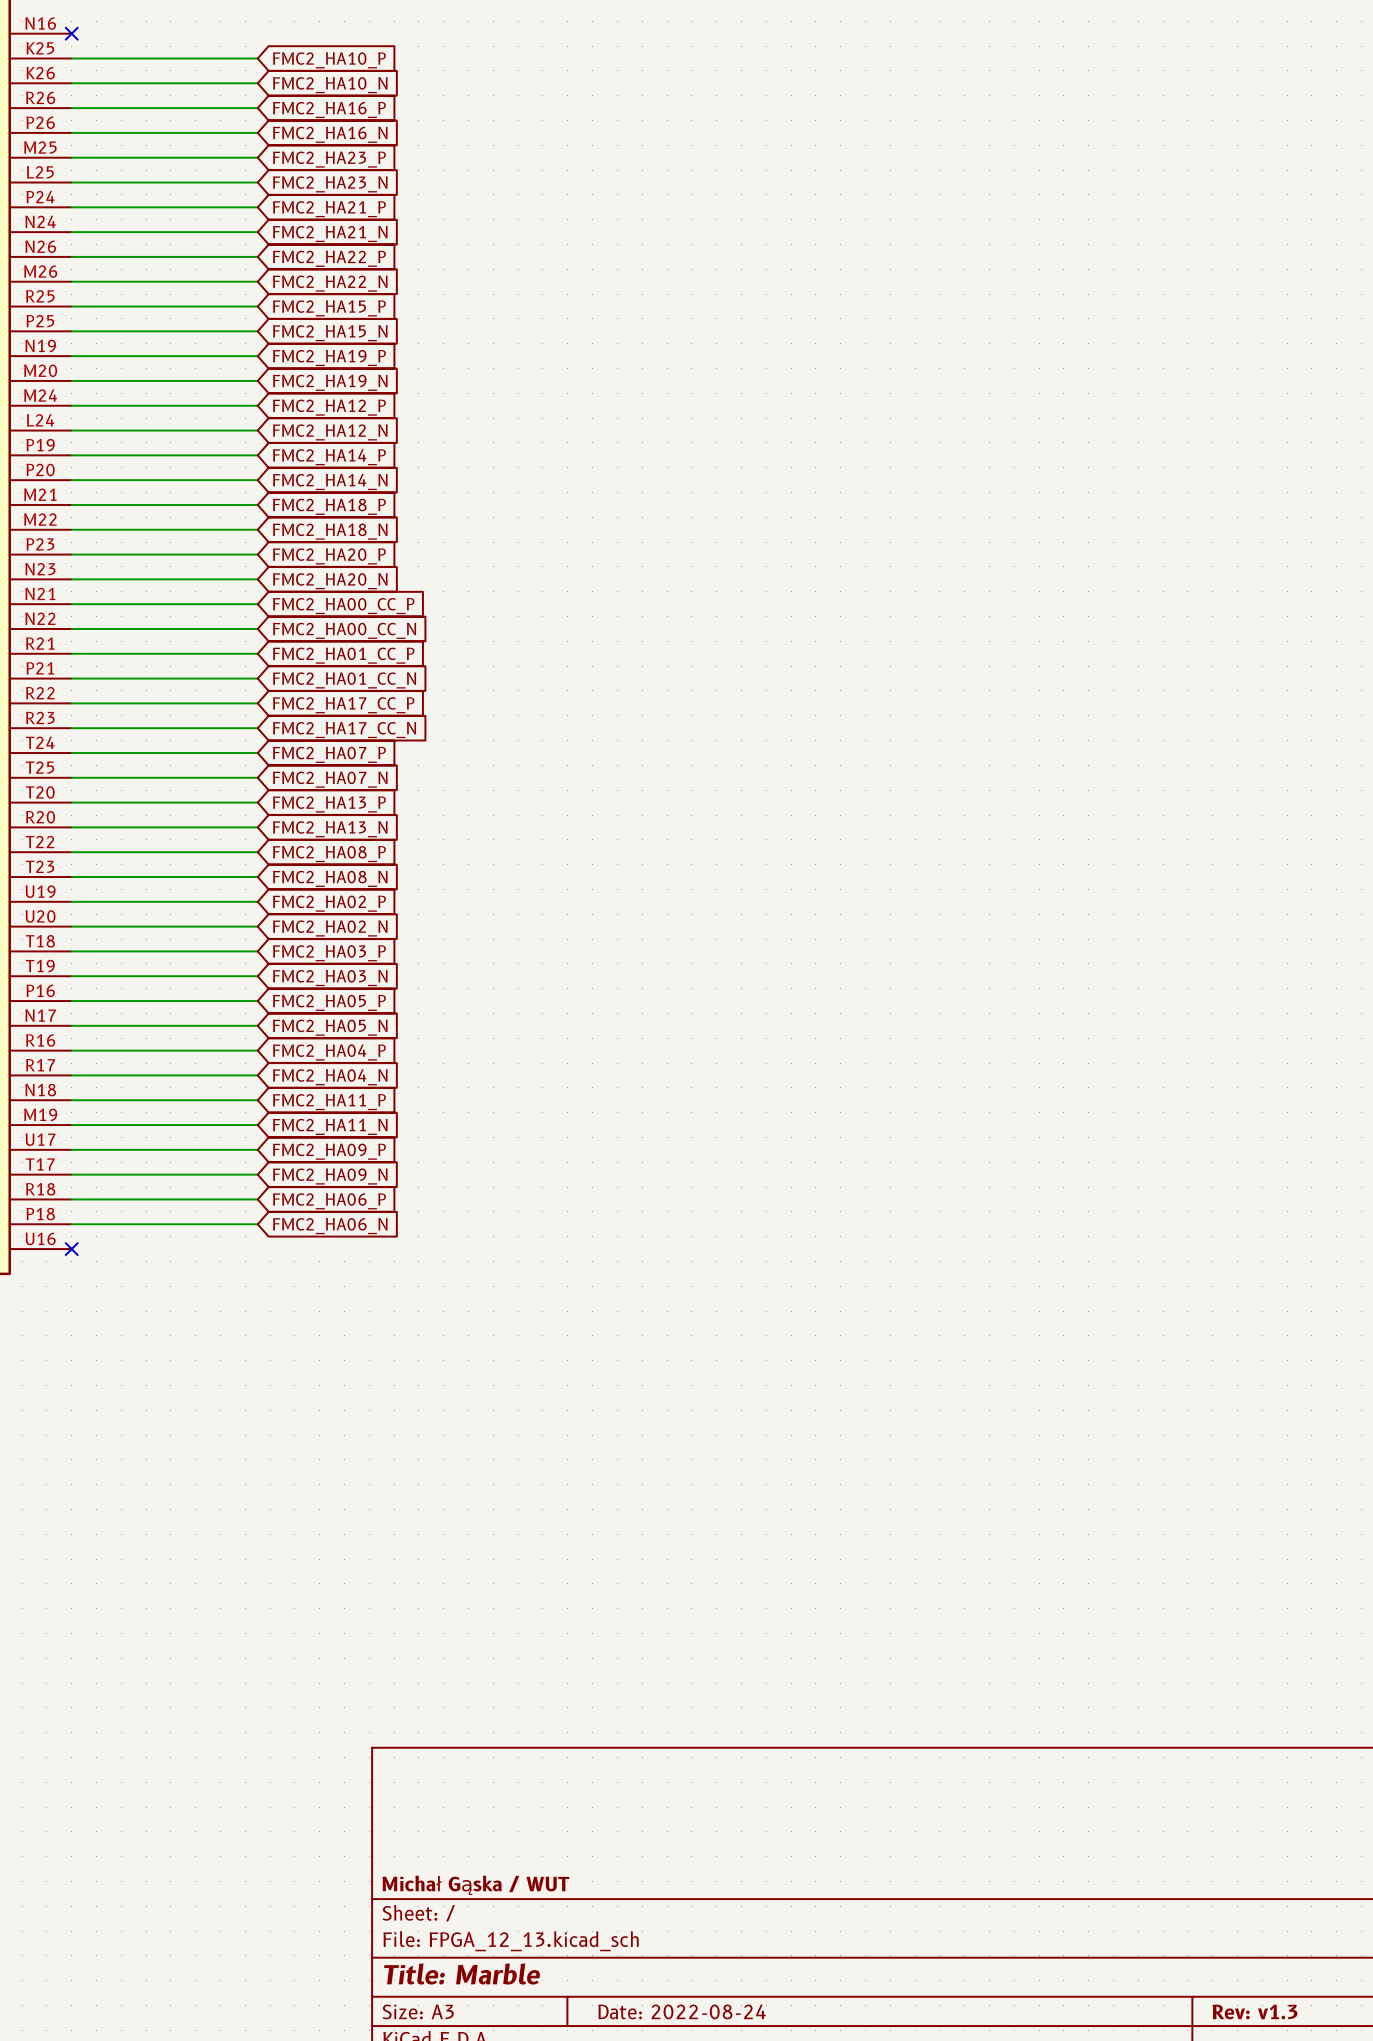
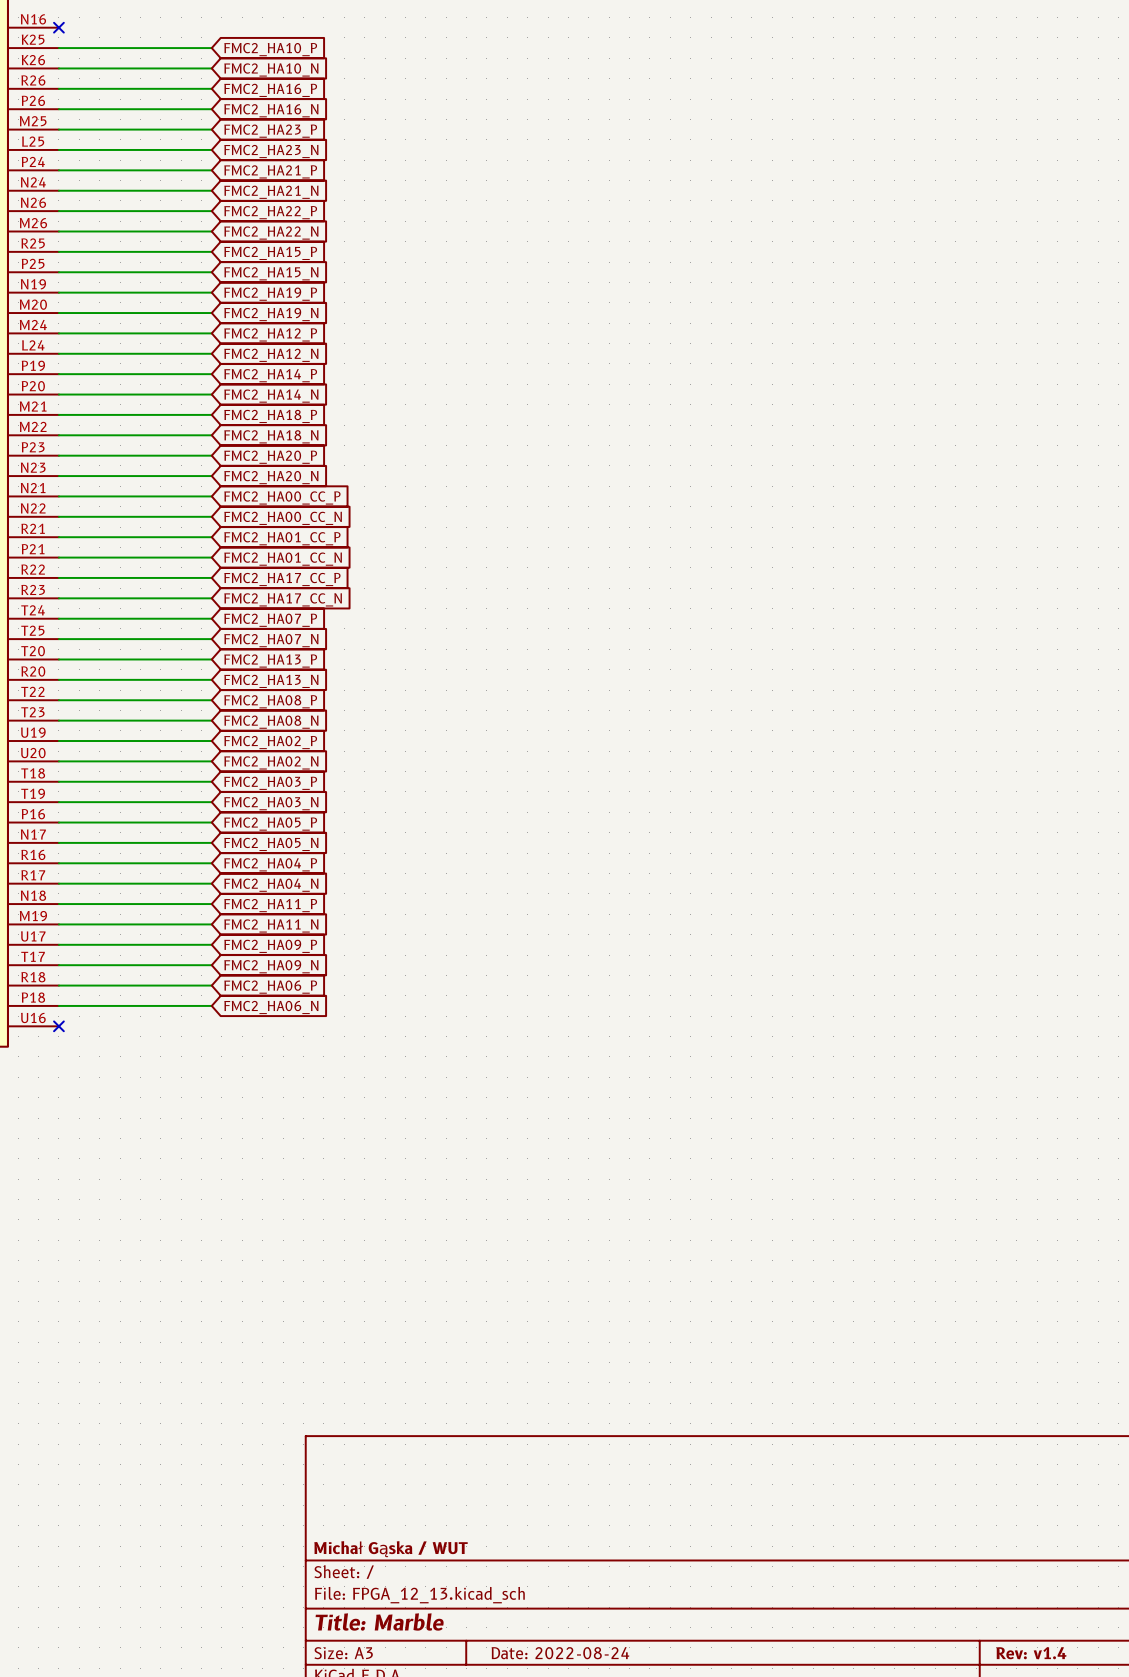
title block: Rev: v1.3 (1255, 2011) -> Rev: v1.4 (1031, 1653)

